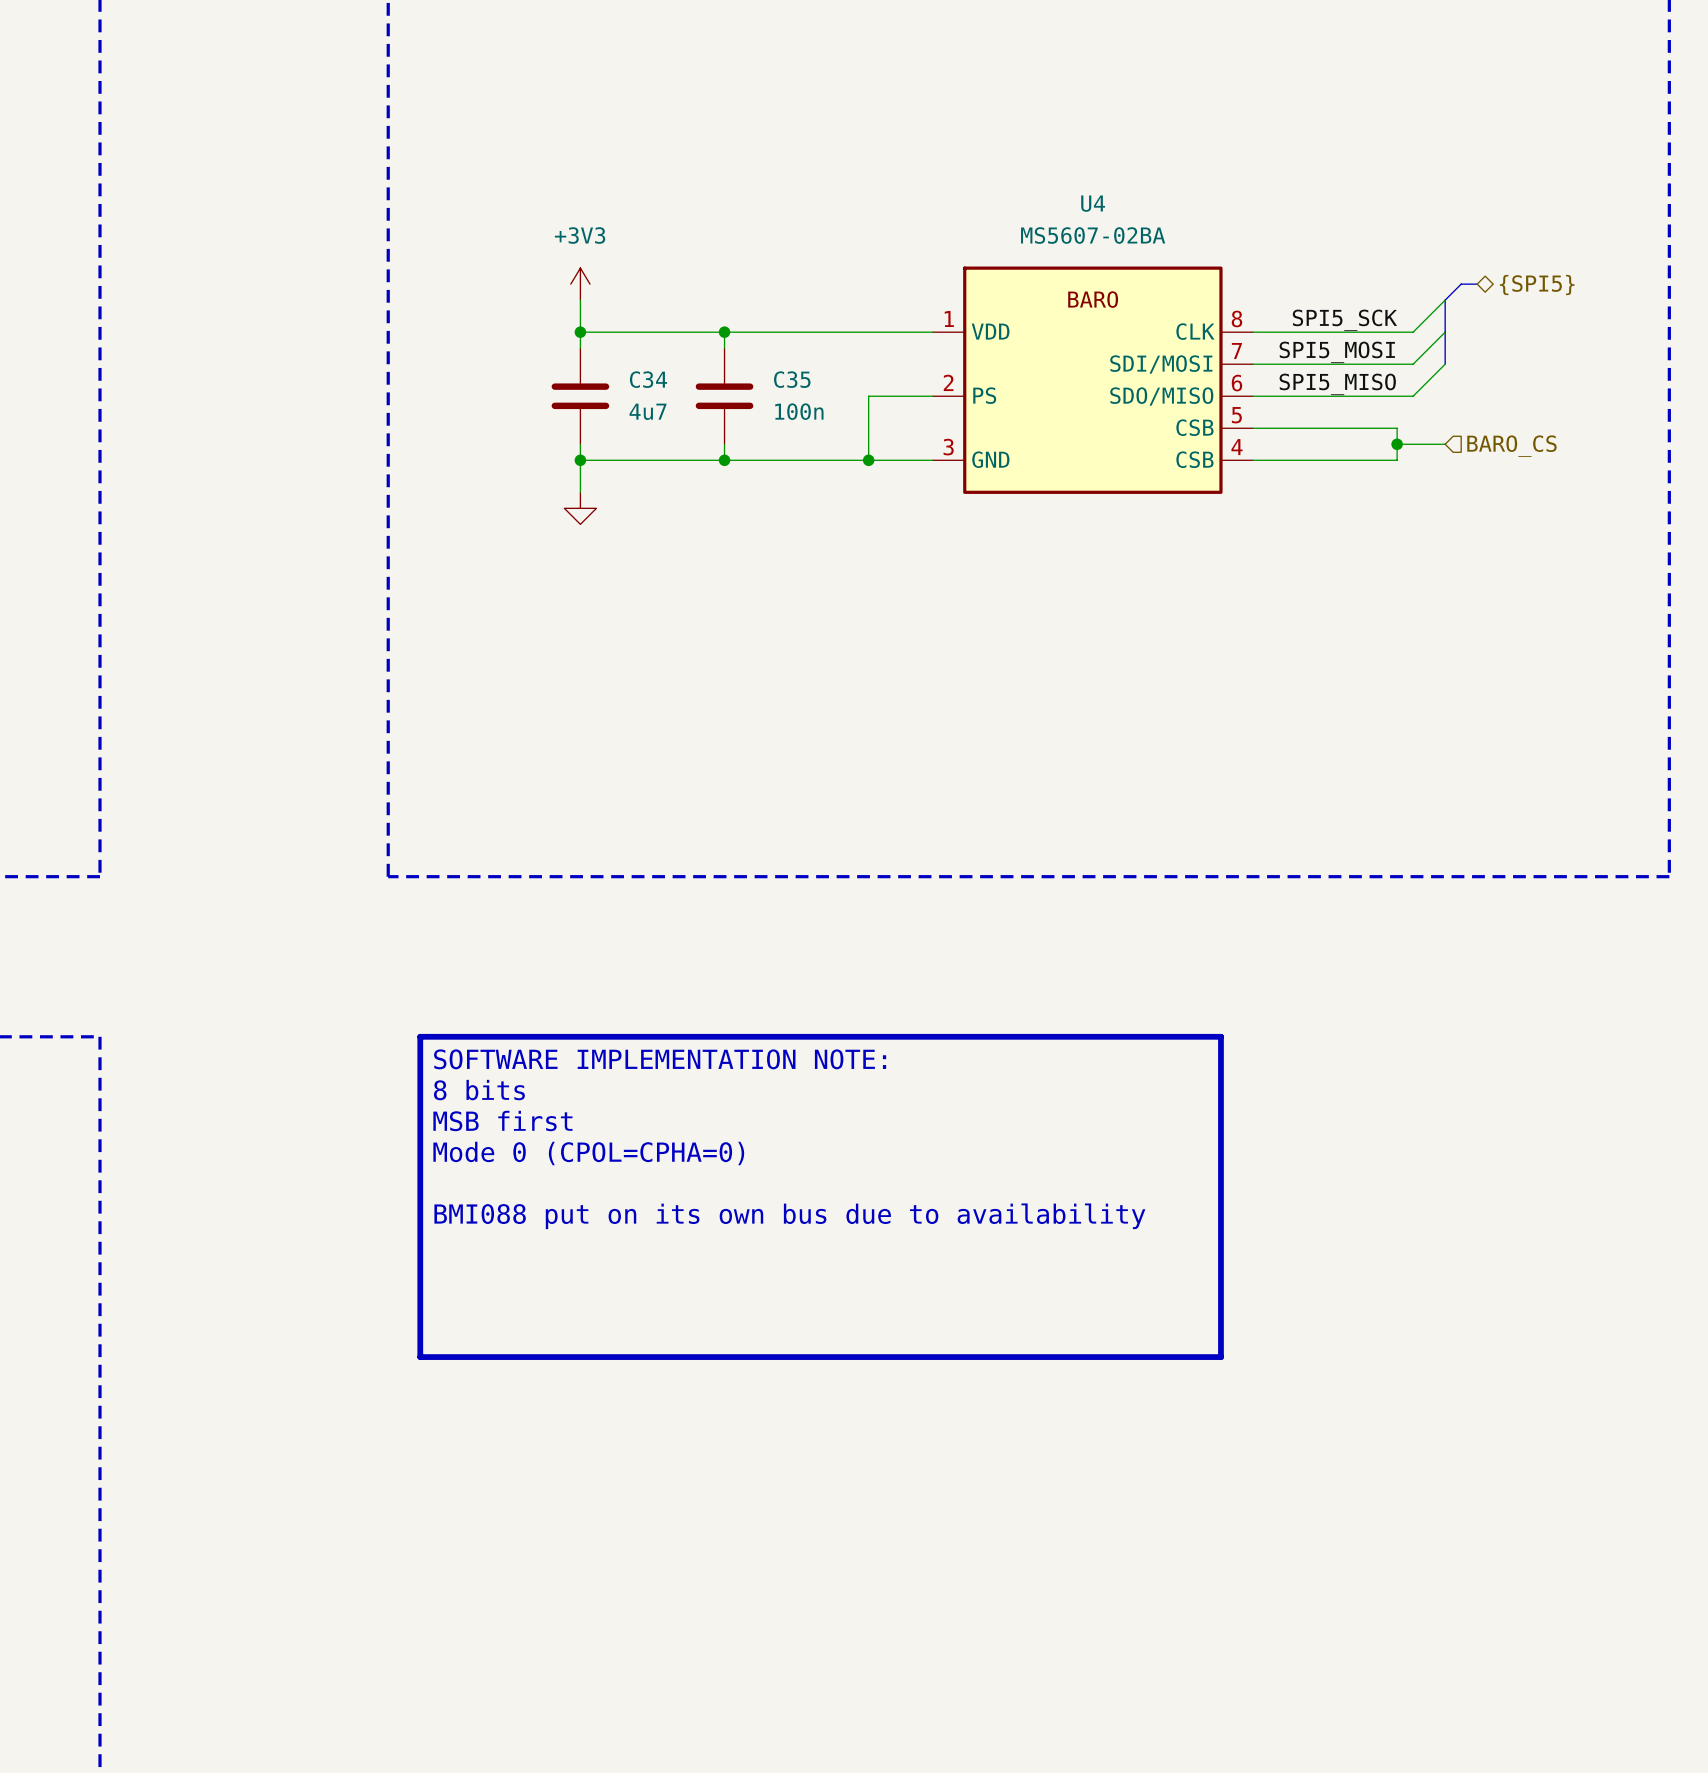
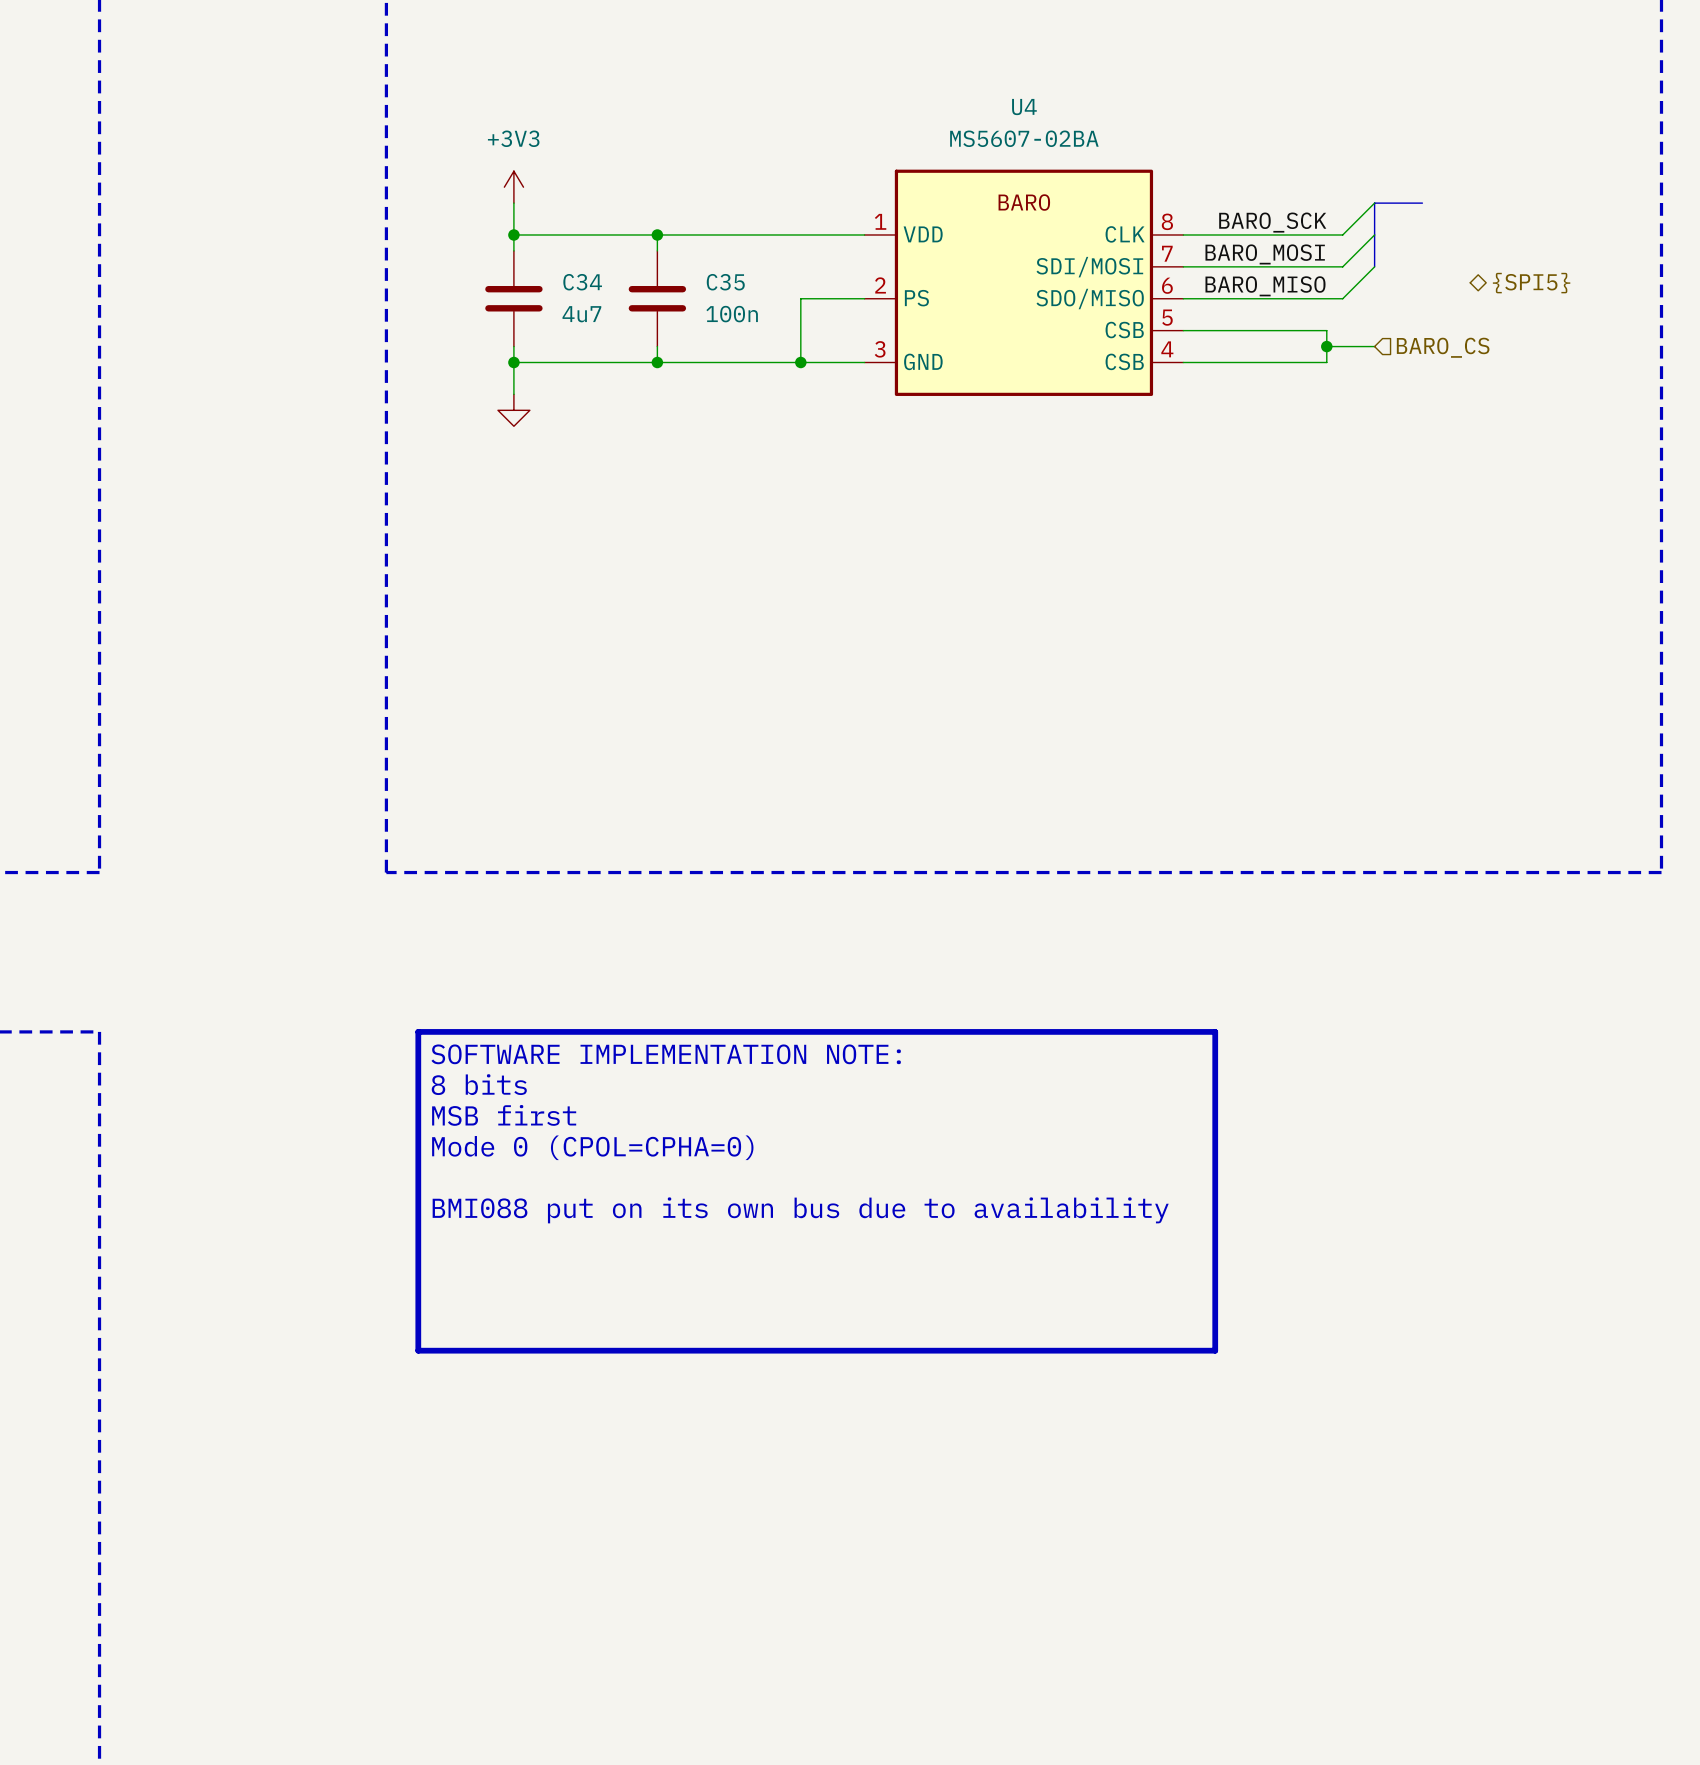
wire: none -> (1374, 203) (1342, 234) (1183, 234)
bus: none -> (1422, 203) (1374, 203) (1374, 266)
label: none -> BARO_SCK (1272, 222)
junction: none -> (513, 234)
junction: none -> (657, 234)
wire: none -> (1374, 234) (1342, 266) (1183, 266)
label: none -> BARO_MOSI (1265, 254)
power symbol position: +3V3 (580, 284) -> +3V3 (513, 187)
bus: (1477, 284) (1461, 284) (1445, 300) (1445, 364) -> none
label: none -> BARO_MISO (1265, 286)
wire: (580, 300) (580, 348) -> (513, 203) (513, 250)
wire: (1445, 300) (1413, 332) (1333, 332) -> none
label: SPI5_SCK (1344, 320) -> none
wire: (580, 332) (932, 332) -> (513, 234) (864, 234)
junction: (580, 332) -> none
wire: (724, 332) (724, 348) -> (657, 234) (657, 250)
junction: (724, 332) -> none
wire: (1445, 332) (1413, 364) (1333, 364) -> (1326, 330) (1326, 362)
junction: none -> (1326, 346)
label: SPI5_MOSI (1337, 352) -> none
junction: none -> (513, 362)
junction: none -> (657, 362)
junction: none -> (800, 362)
wire: (1445, 364) (1413, 396) (1252, 396) -> (1374, 266) (1342, 298) (1183, 298)
U4 position: (1092, 380) -> (1023, 282)
label: SPI5_MISO (1337, 384) -> none
C34 position: (580, 396) -> (513, 298)
C35 position: (724, 396) -> (657, 298)
wire: (932, 396) (868, 396) (868, 460) -> (864, 298) (800, 298) (800, 362)
wire: (1252, 428) (1397, 428) (1397, 460) (1252, 460) -> none
wire: (580, 444) (580, 492) -> (513, 346) (513, 394)
wire: (724, 444) (724, 460) -> (657, 346) (657, 362)
wire: (1397, 444) (1445, 444) -> (1326, 346) (1374, 346)
junction: (1397, 444) -> none
hierarchical label position: BARO_CS (1511, 446) -> BARO_CS (1443, 347)
wire: (580, 460) (932, 460) -> (513, 362) (864, 362)
junction: (580, 460) -> none
junction: (724, 460) -> none
junction: (868, 460) -> none
power symbol position: (580, 508) -> (513, 410)

